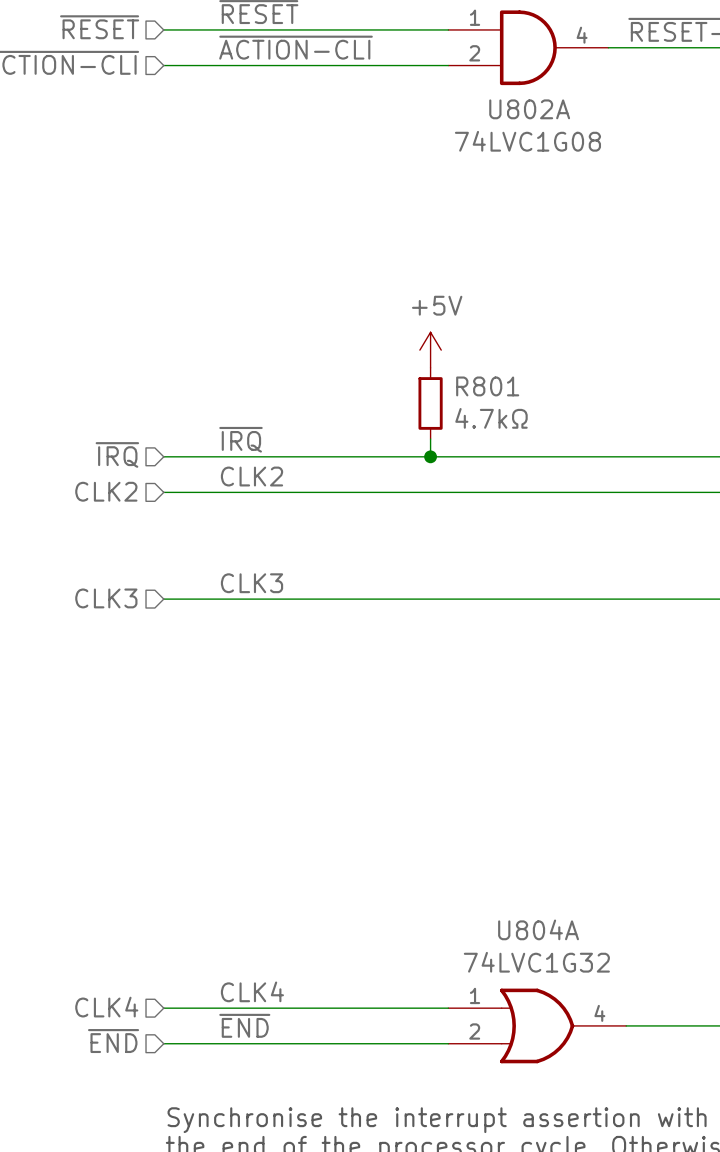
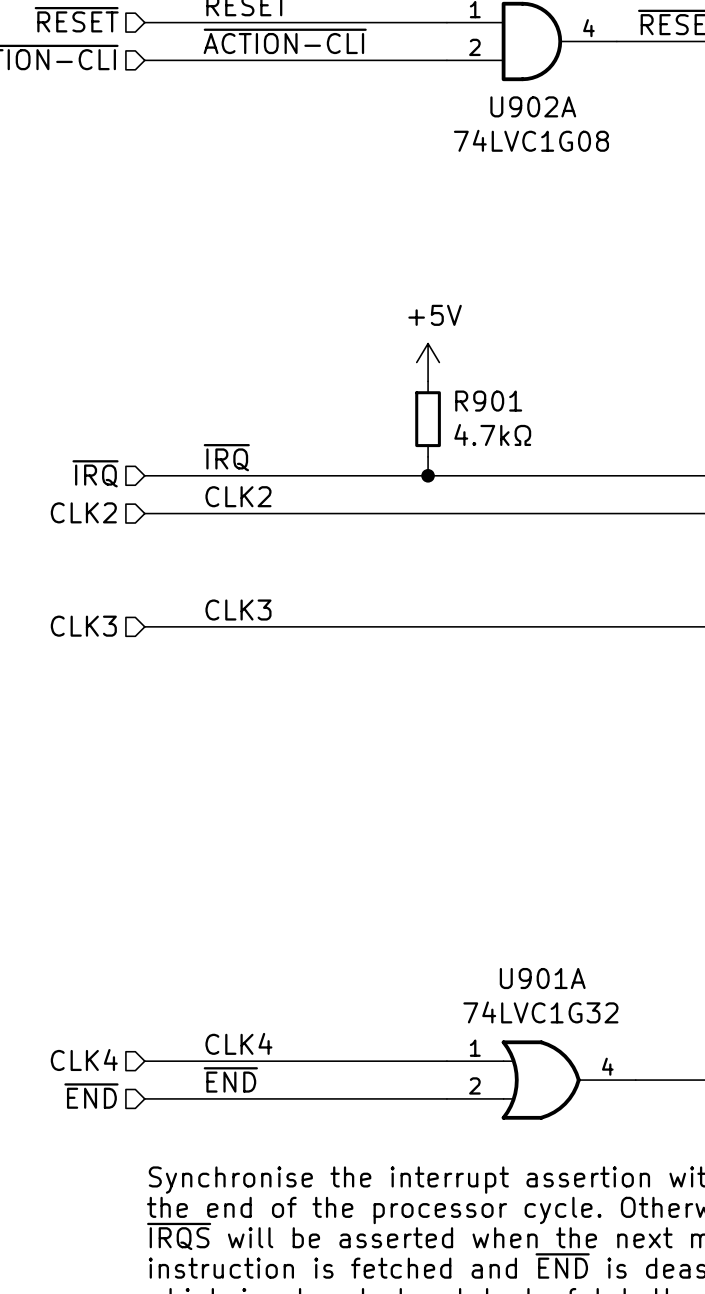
U802A name: U802A (529, 109) -> U902A (533, 106)
R801 name: R801 (487, 386) -> R901 (488, 401)
U804A name: U804A (538, 929) -> U901A (542, 978)

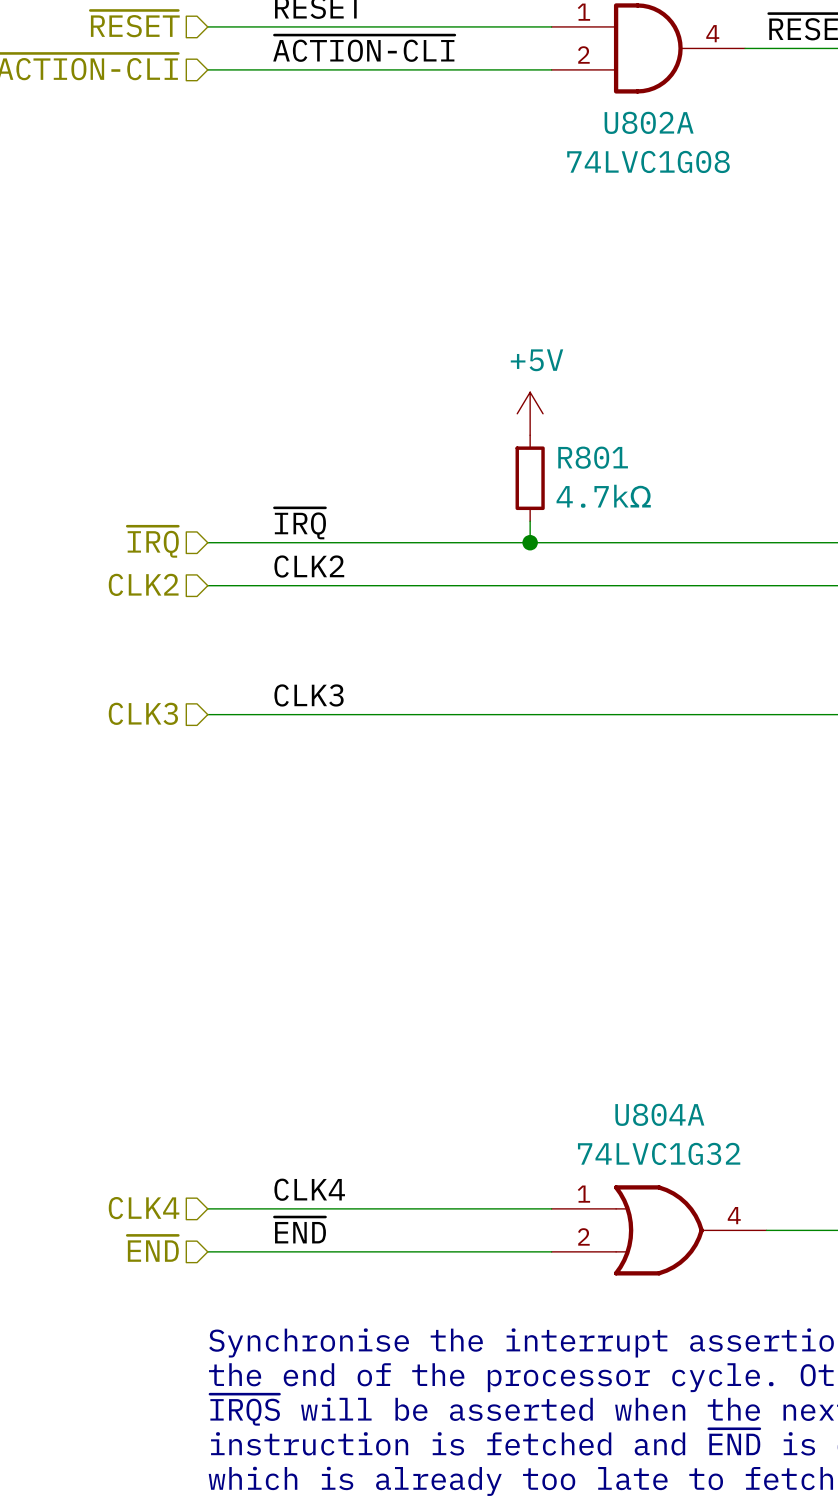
U902A name: U902A (533, 106) -> U802A (649, 122)
R901 name: R901 (488, 401) -> R801 (593, 457)
U901A name: U901A (542, 978) -> U804A (659, 1114)

